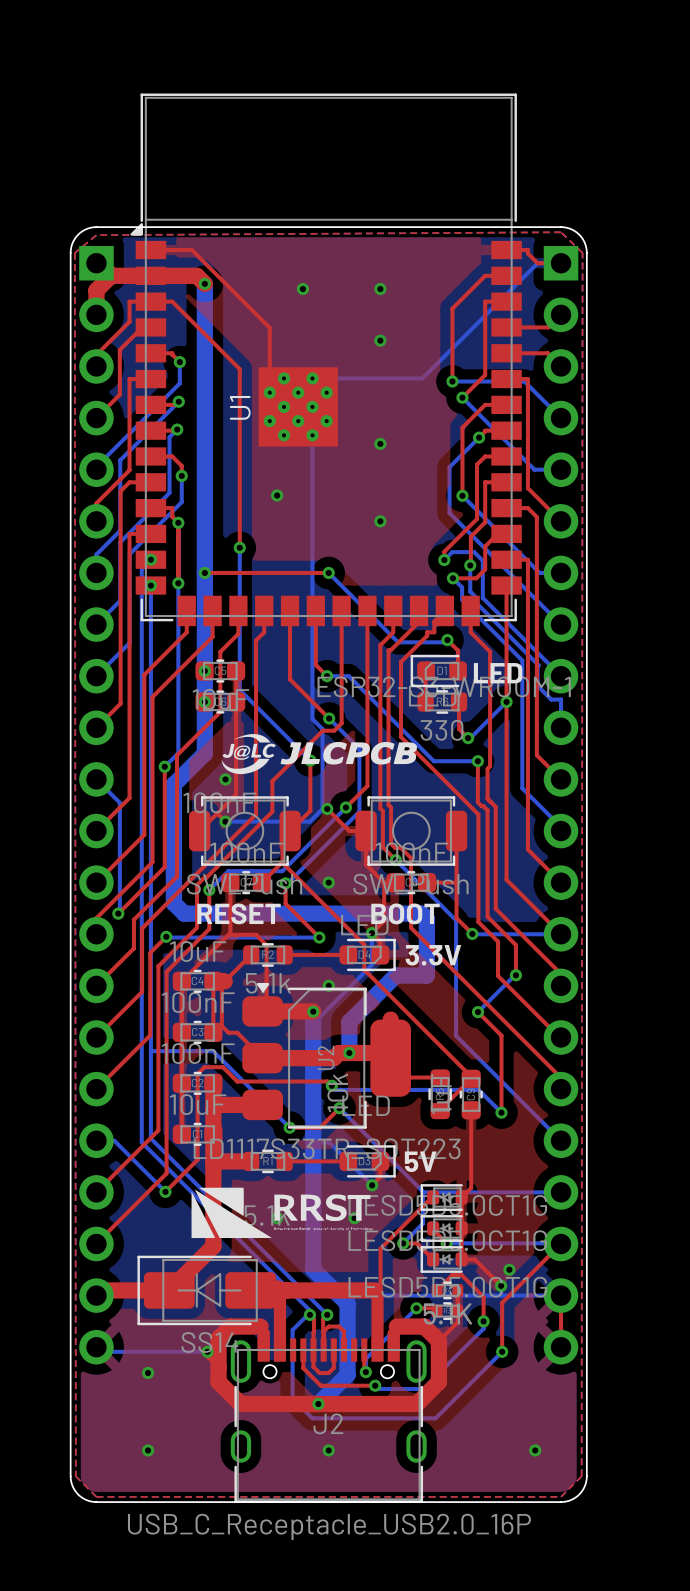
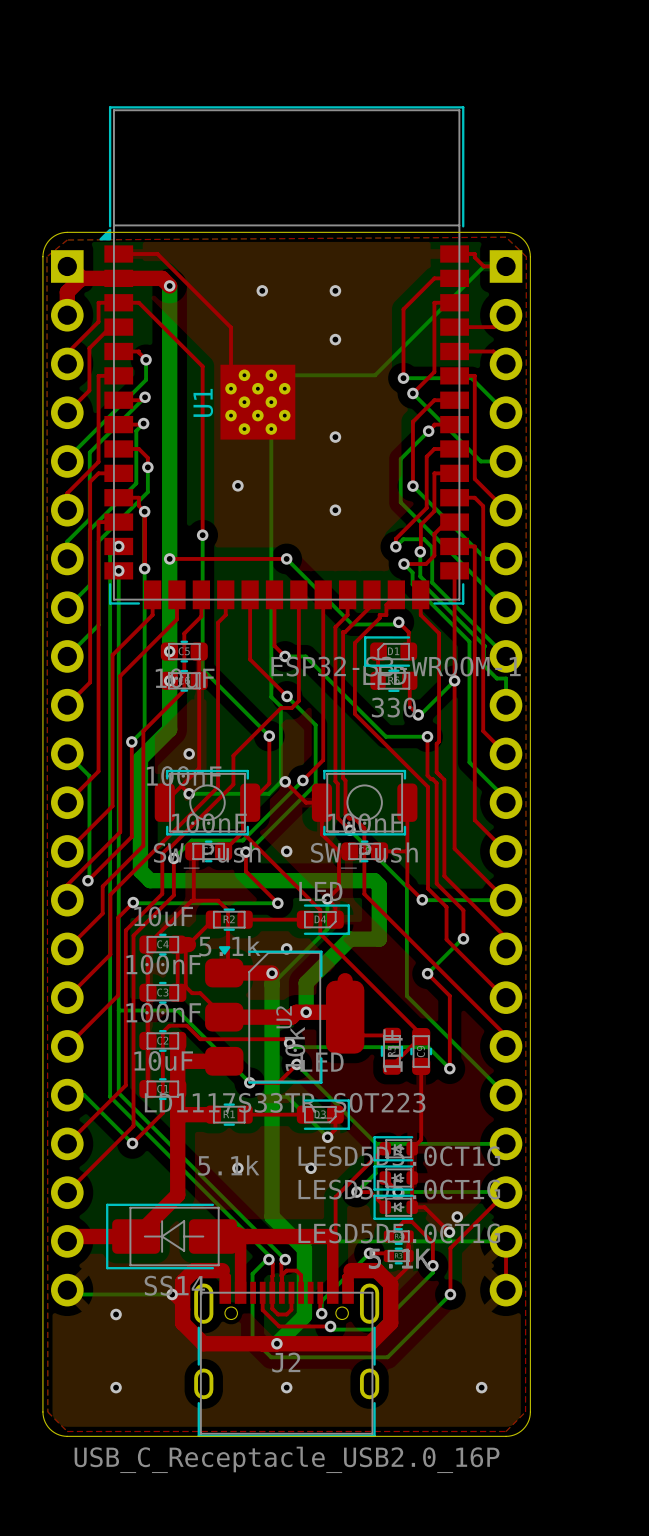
text: LED (498, 673) -> none
drawing: [221, 734, 417, 775] -> none
text: RESET (239, 913) -> none
text: BOOT (405, 913) -> none
text: 3.3V (433, 955) -> none
text: 5V (420, 1161) -> none
drawing: [191, 1187, 373, 1239] -> none

